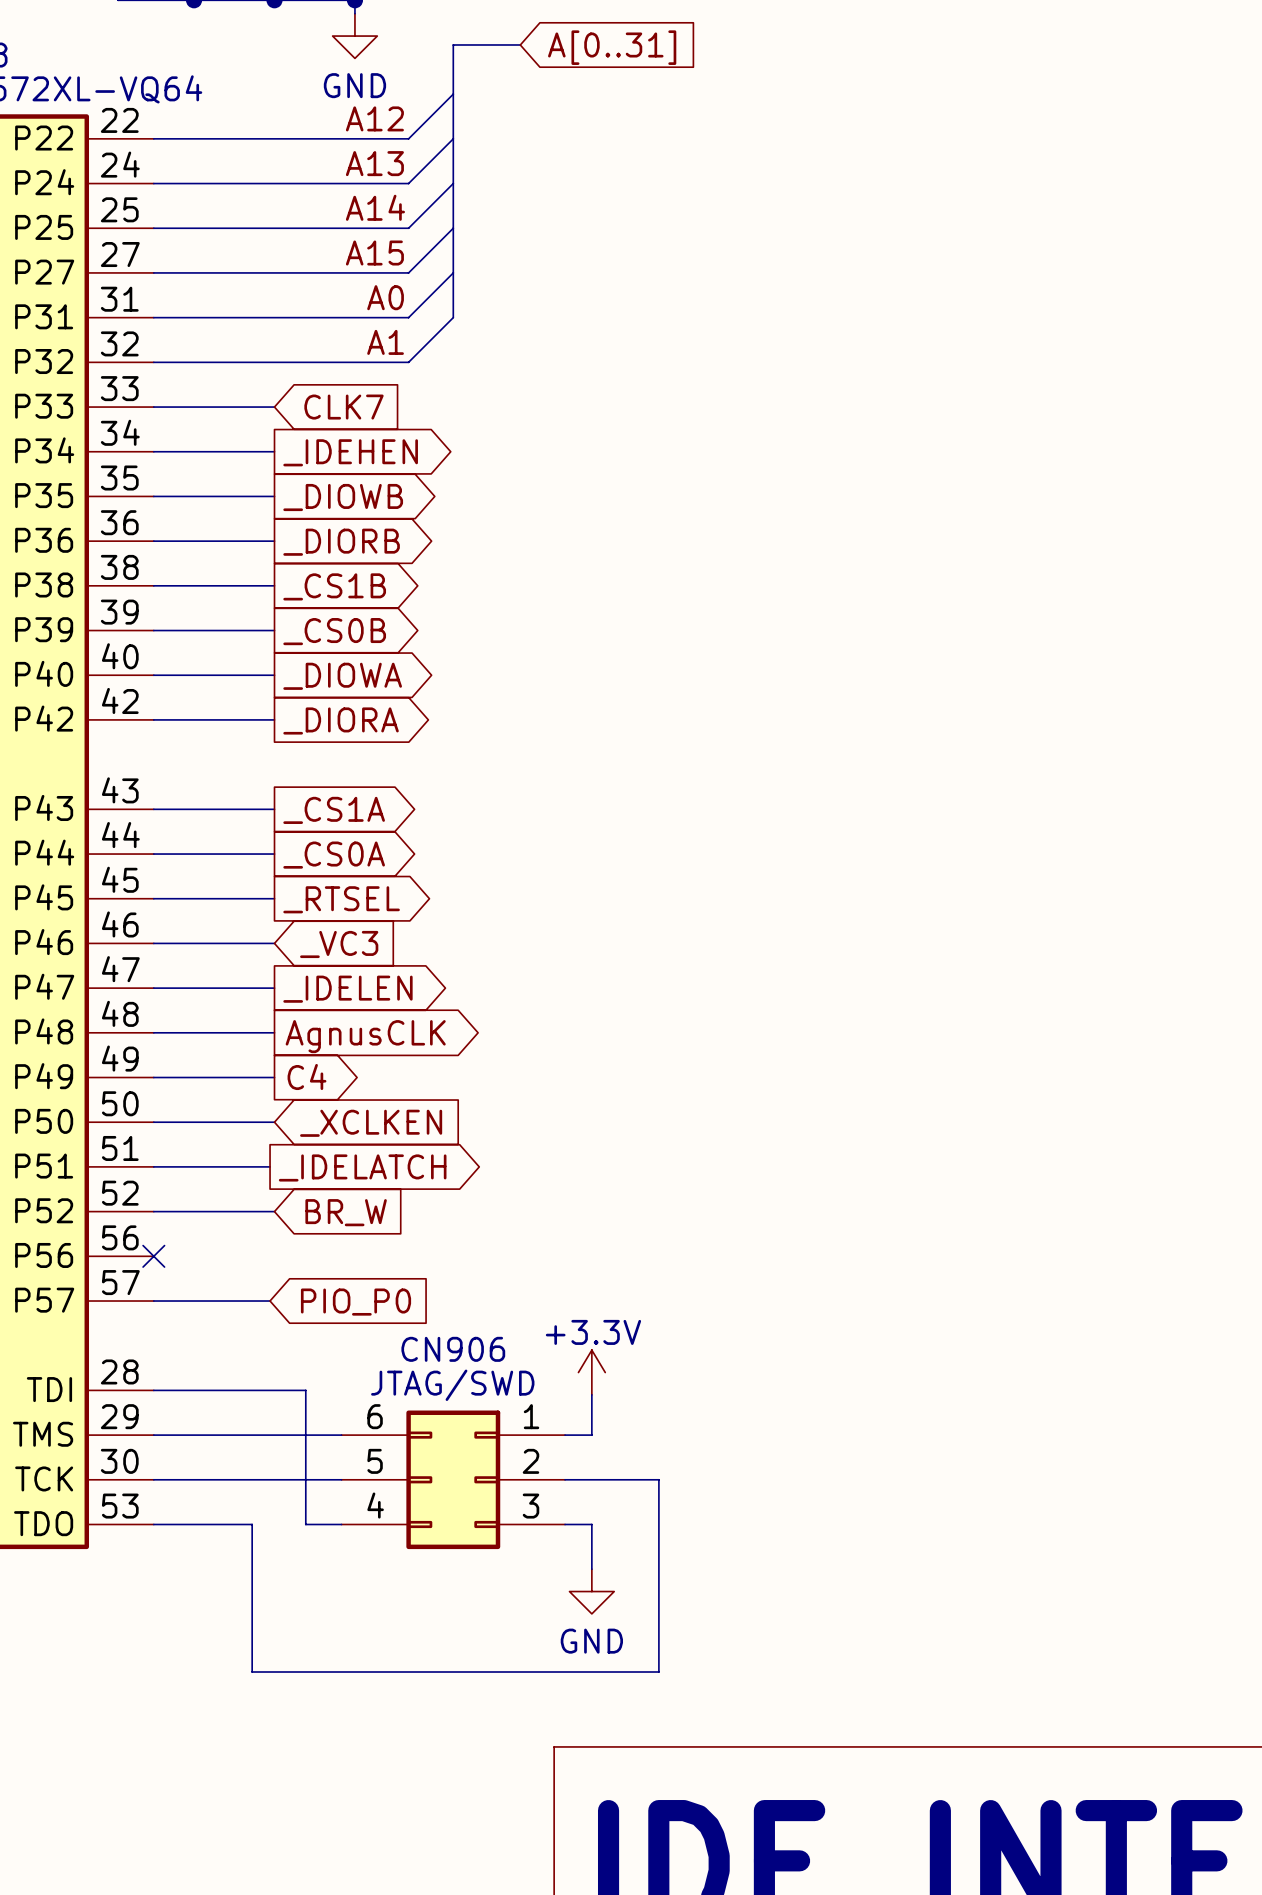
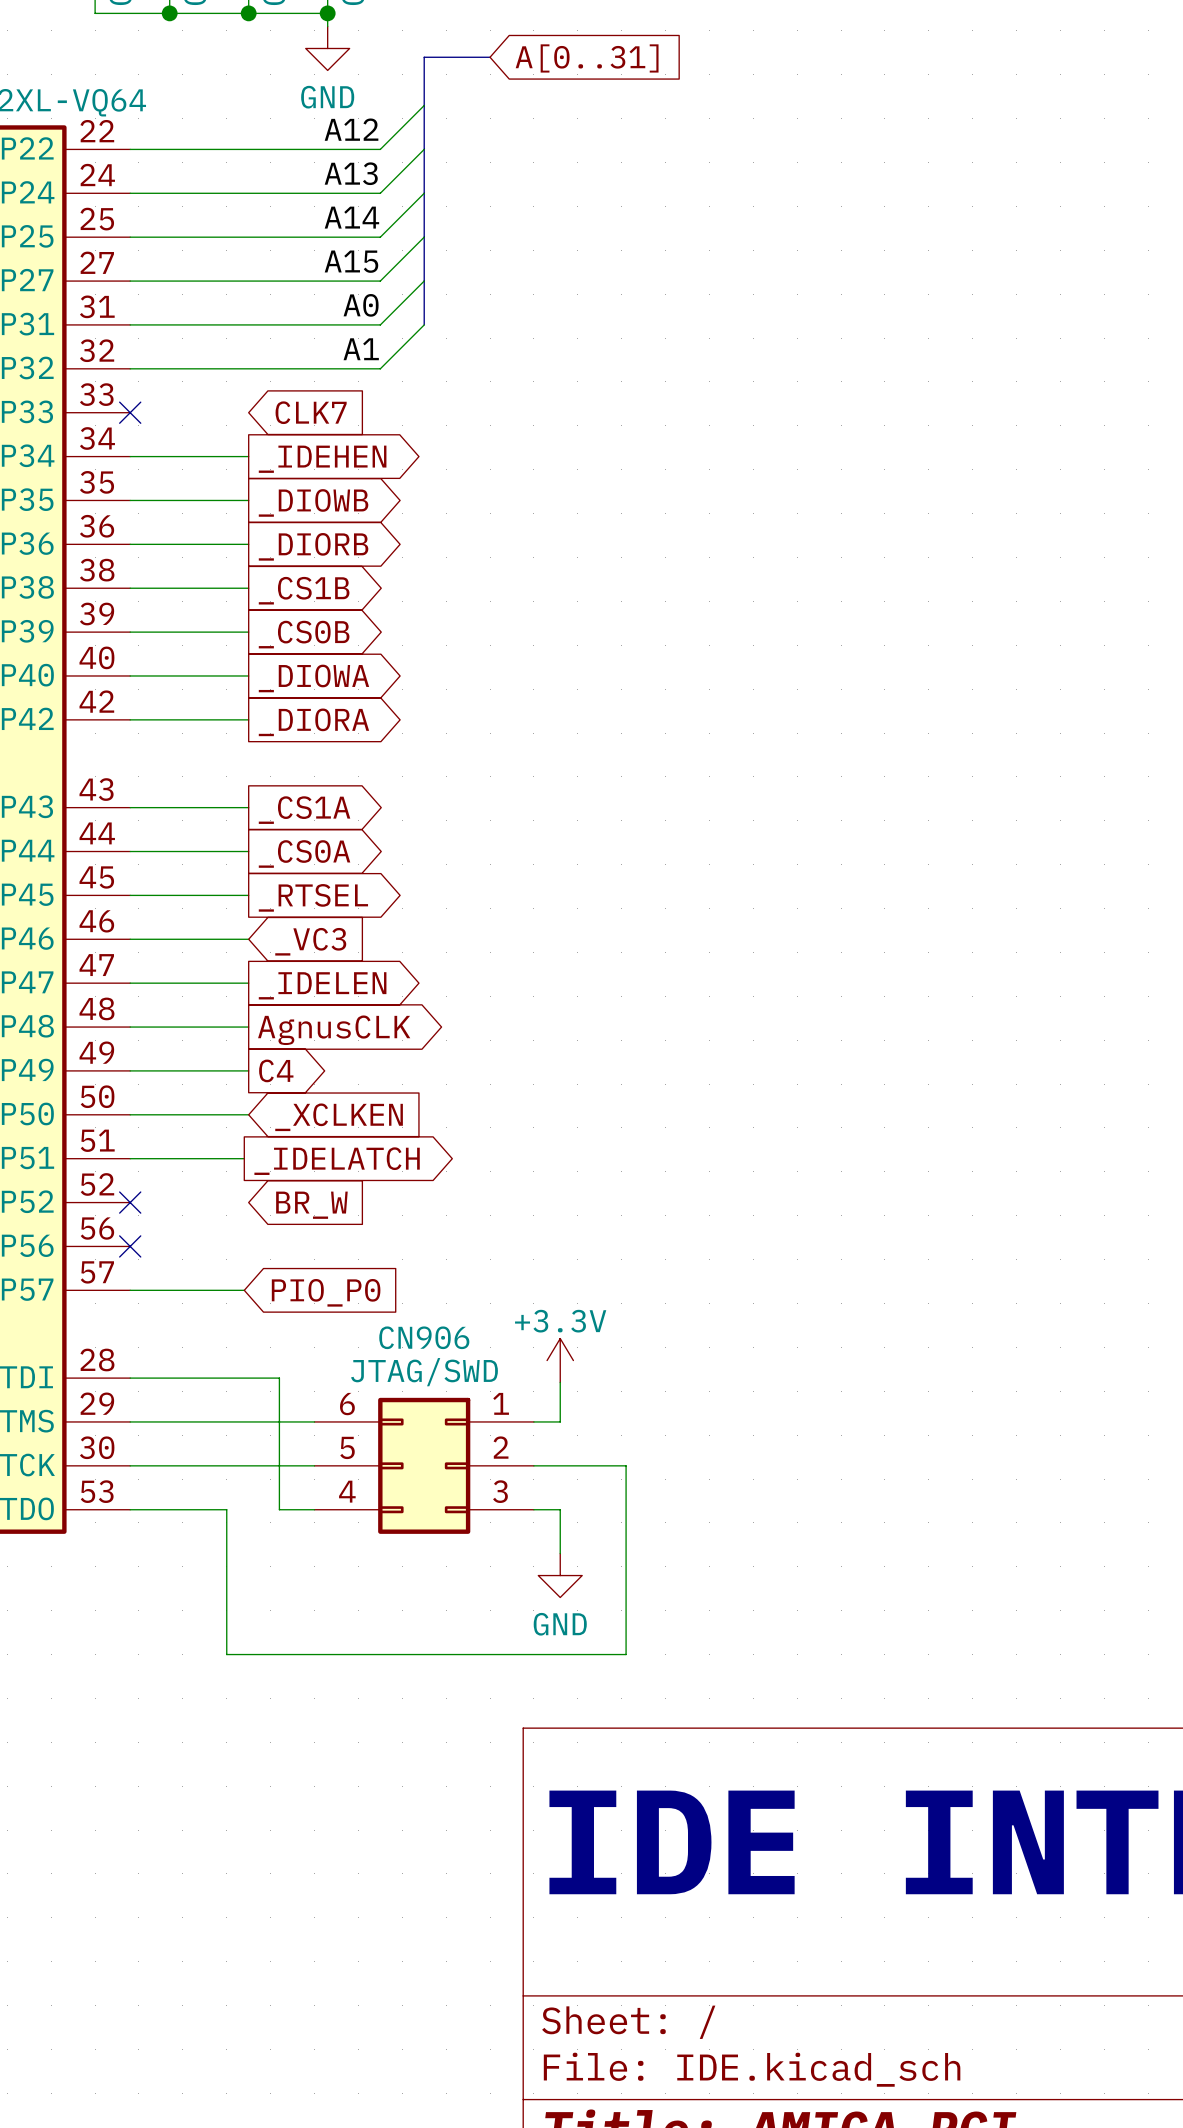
wire: (153, 407) (274, 407) -> none
no-connect mark: none -> (130, 412)
wire: (153, 1211) (274, 1211) -> none
no-connect mark: none -> (130, 1202)

